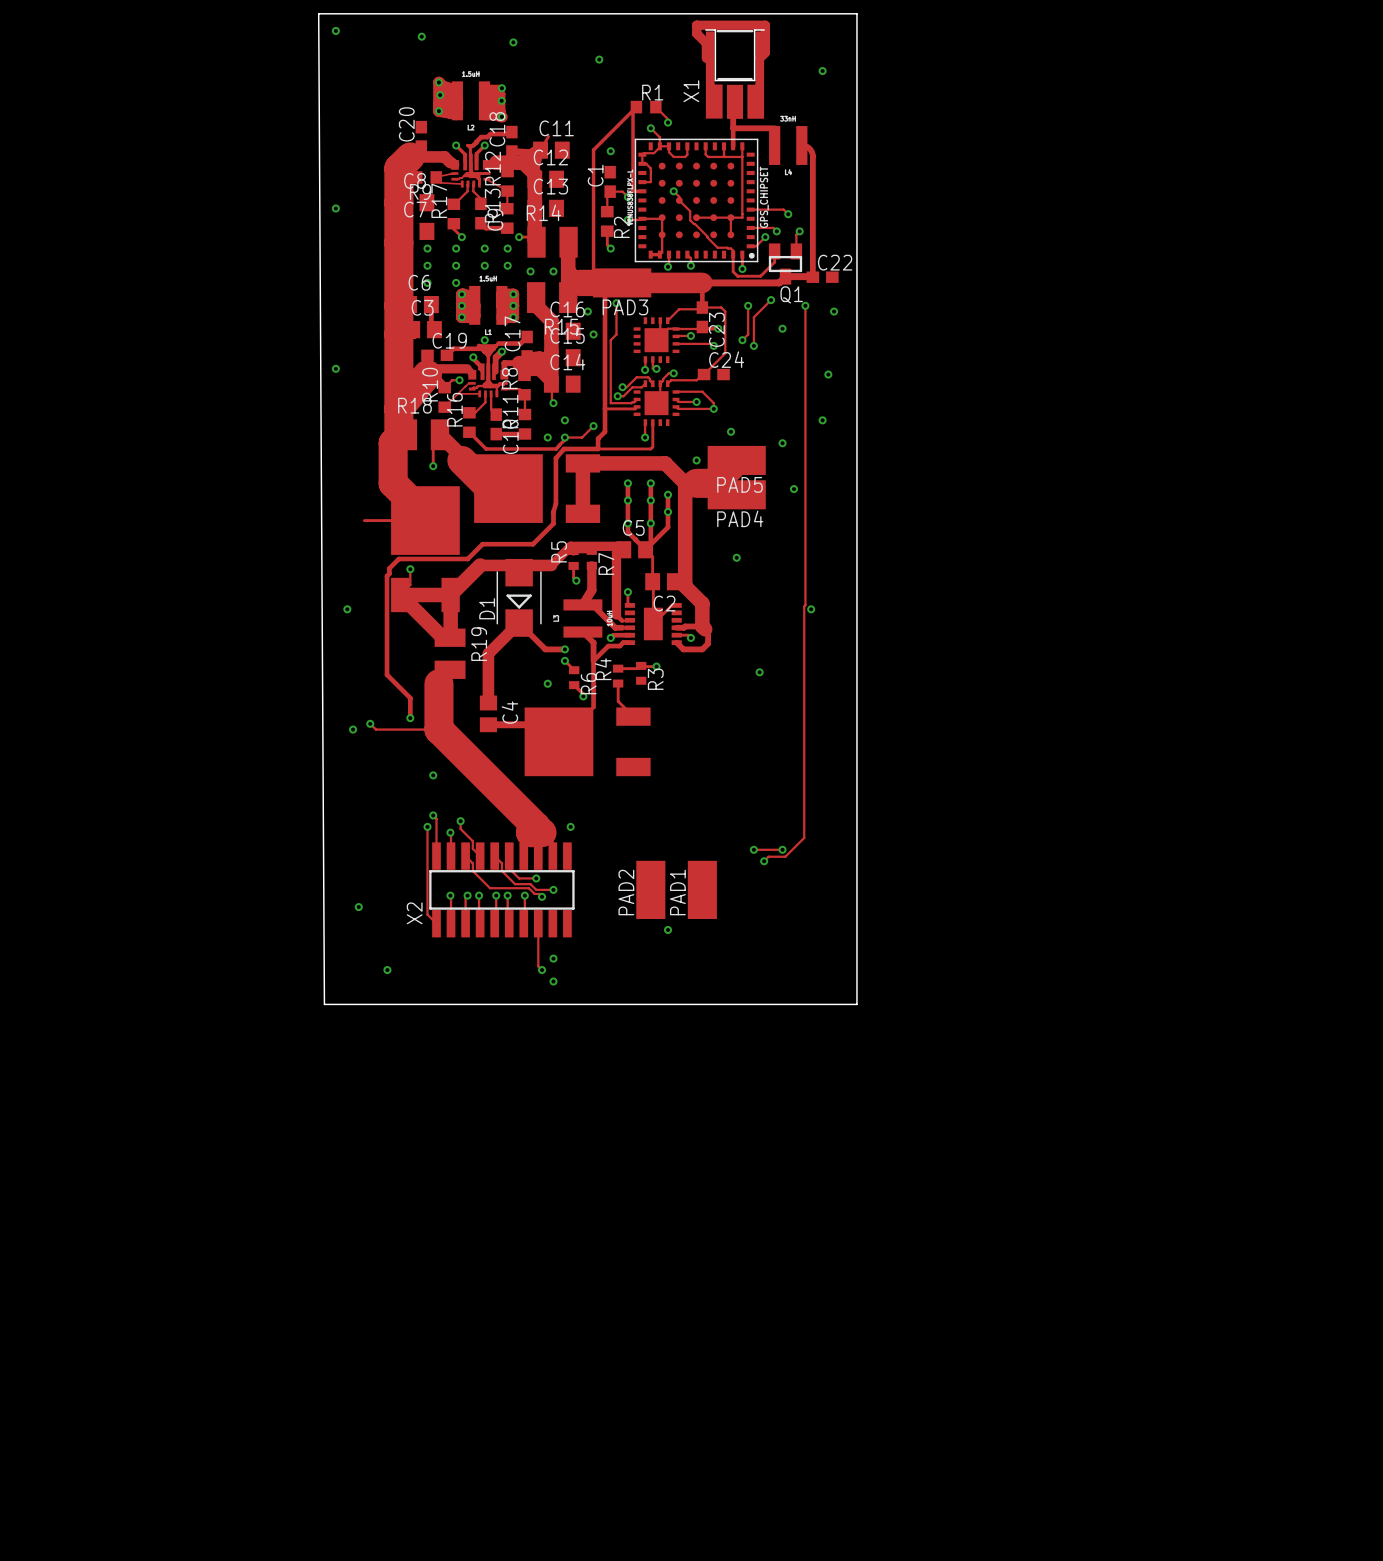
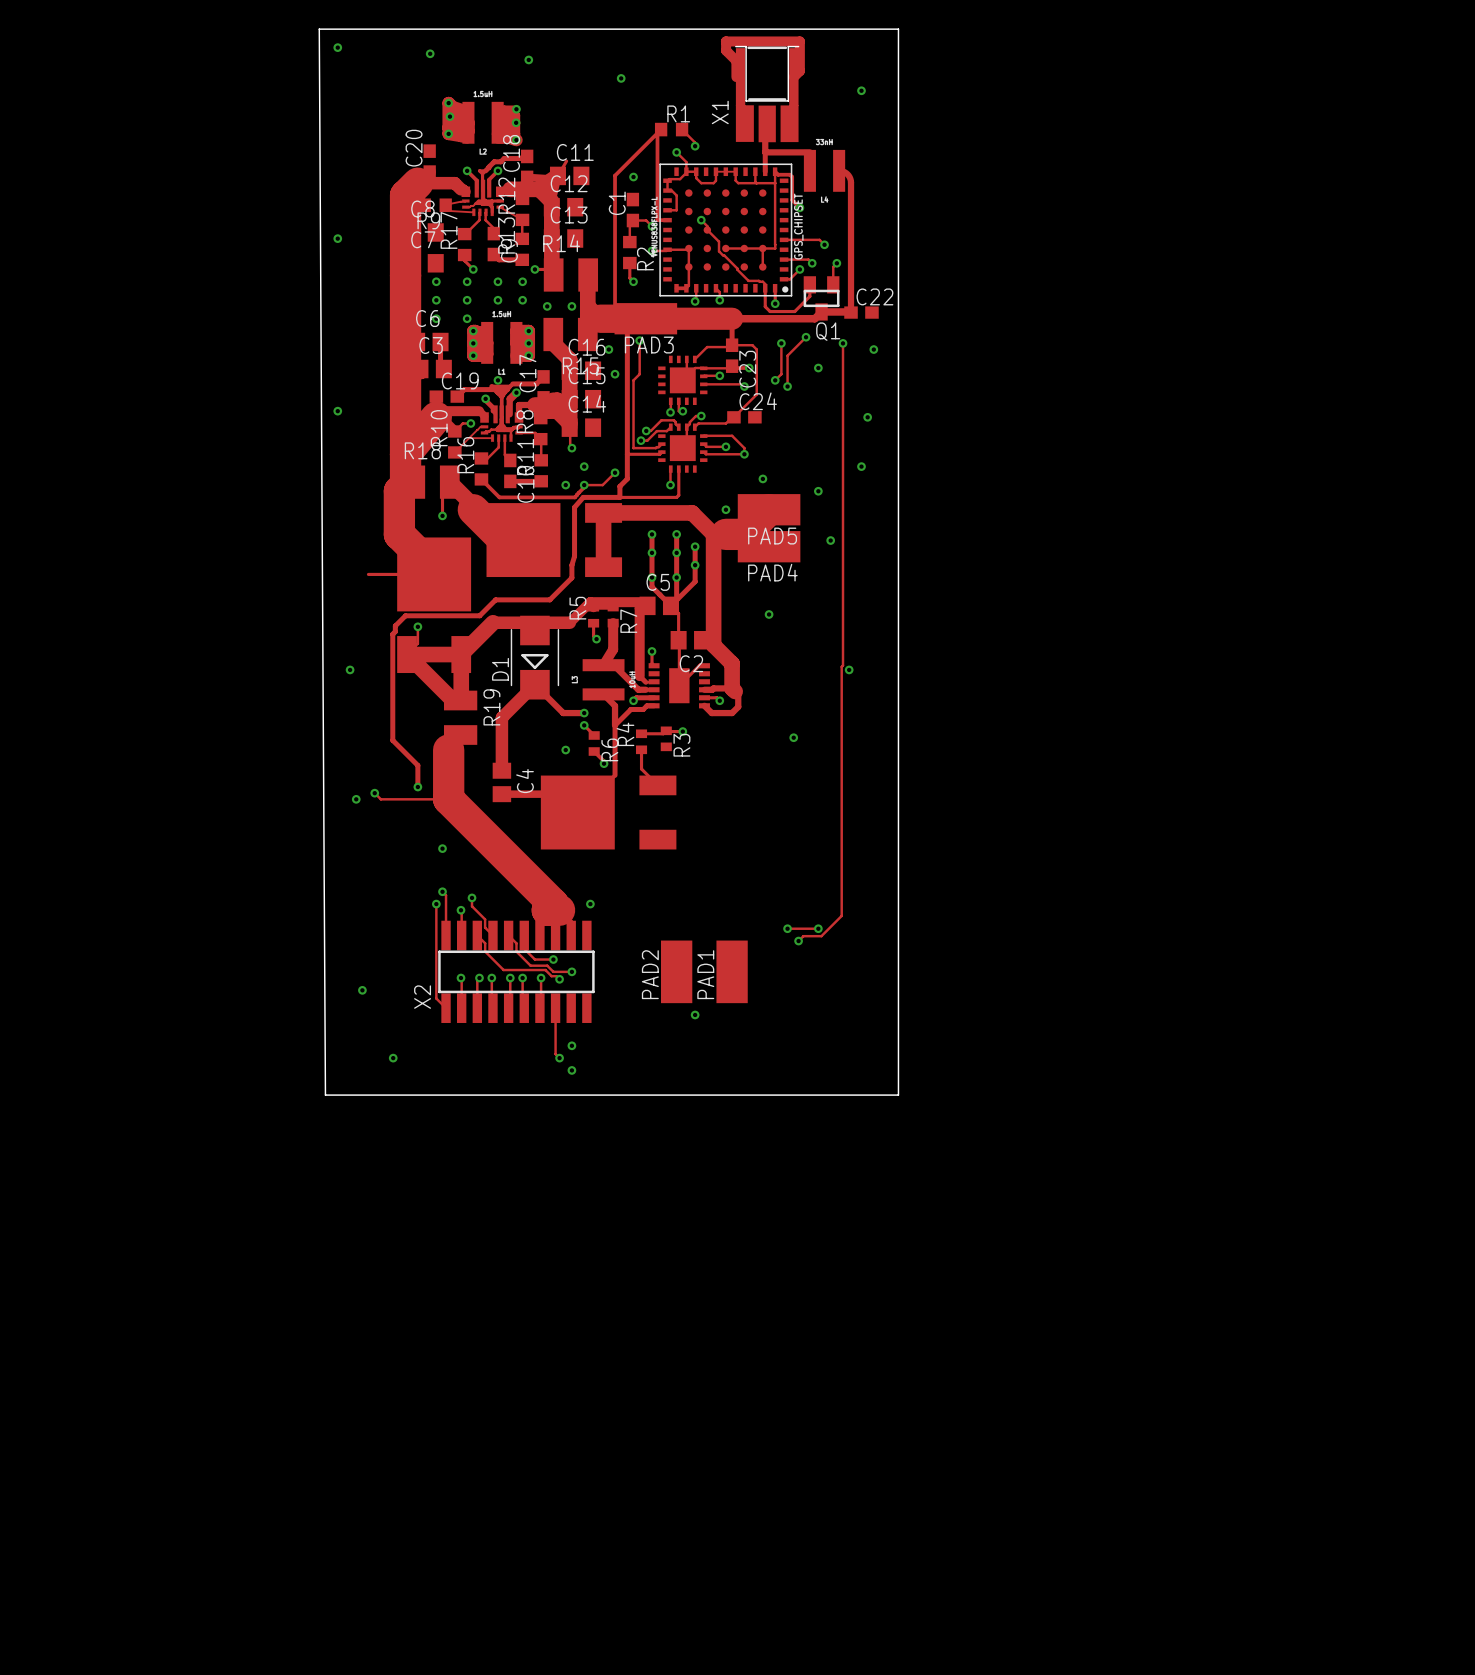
track: none -> (715, 171) (735, 171)
track: none -> (775, 171) (778, 174) (789, 174) (792, 176) (792, 200) (799, 207)
via: none -> (799, 207)

